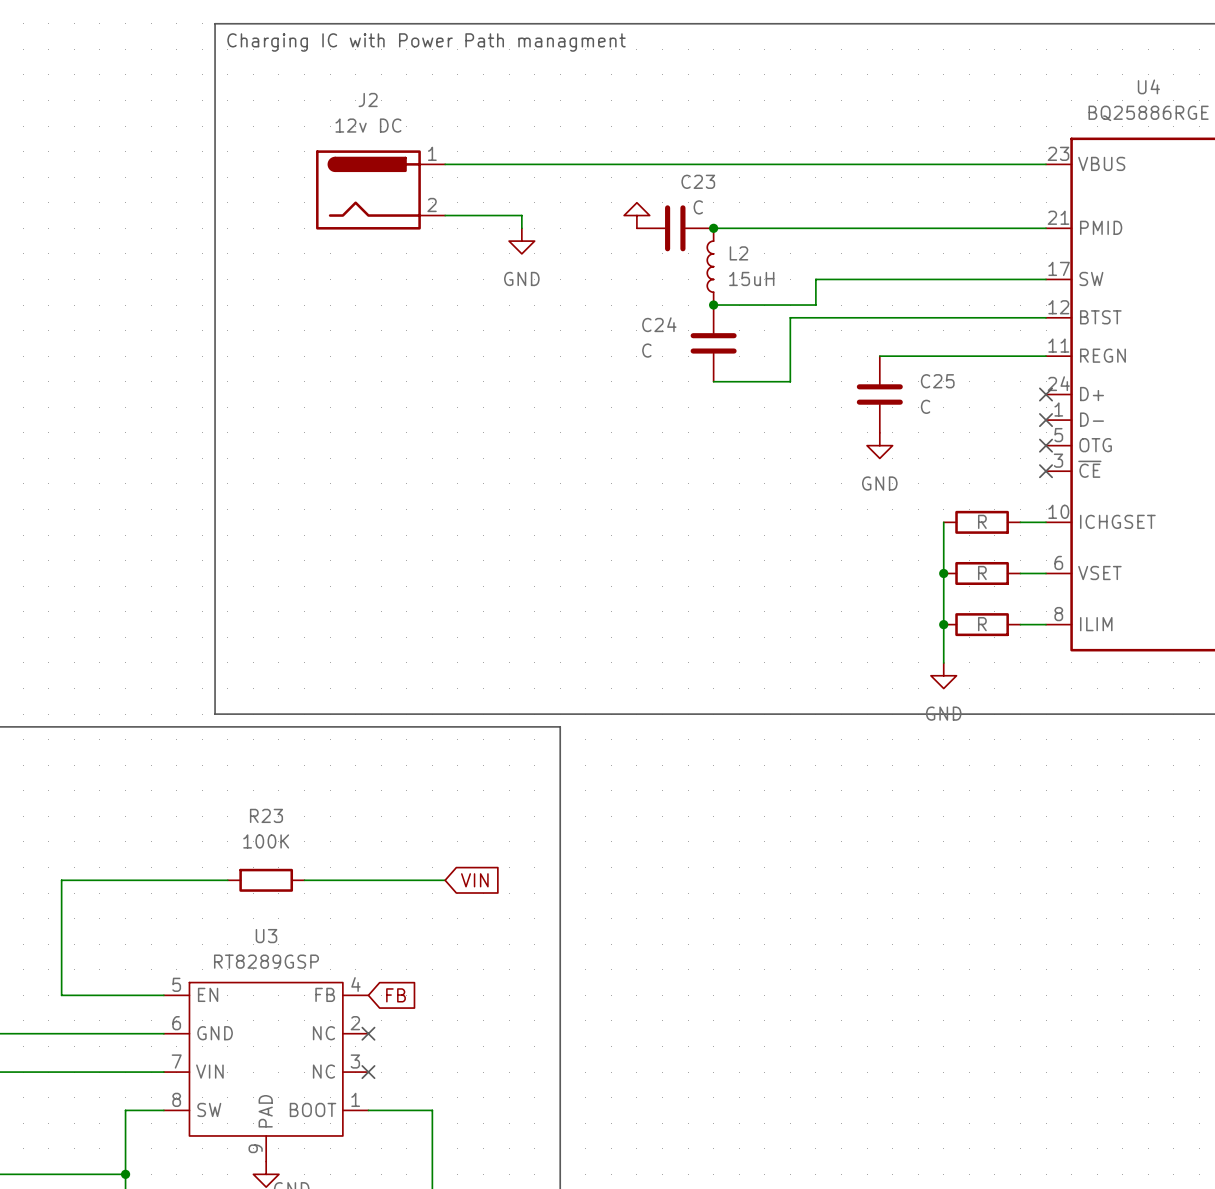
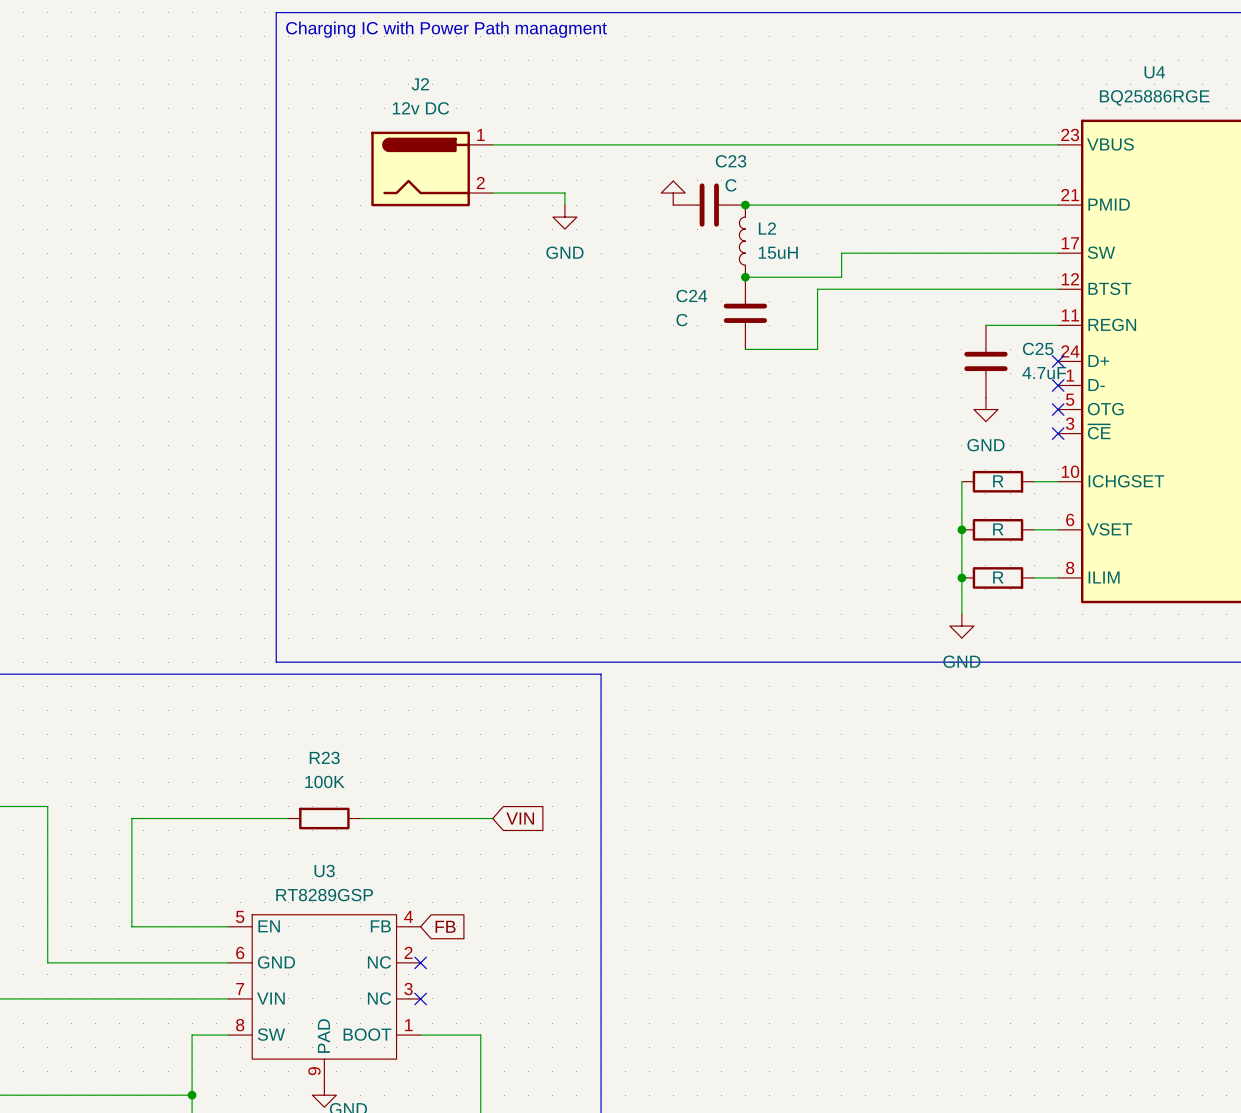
wire: (879, 356) (969, 356) -> none
C25 position: (879, 394) -> (985, 361)
C25 value: C (925, 406) -> 4.7uF (1044, 373)
power symbol position: GND (879, 445) -> GND (985, 409)

